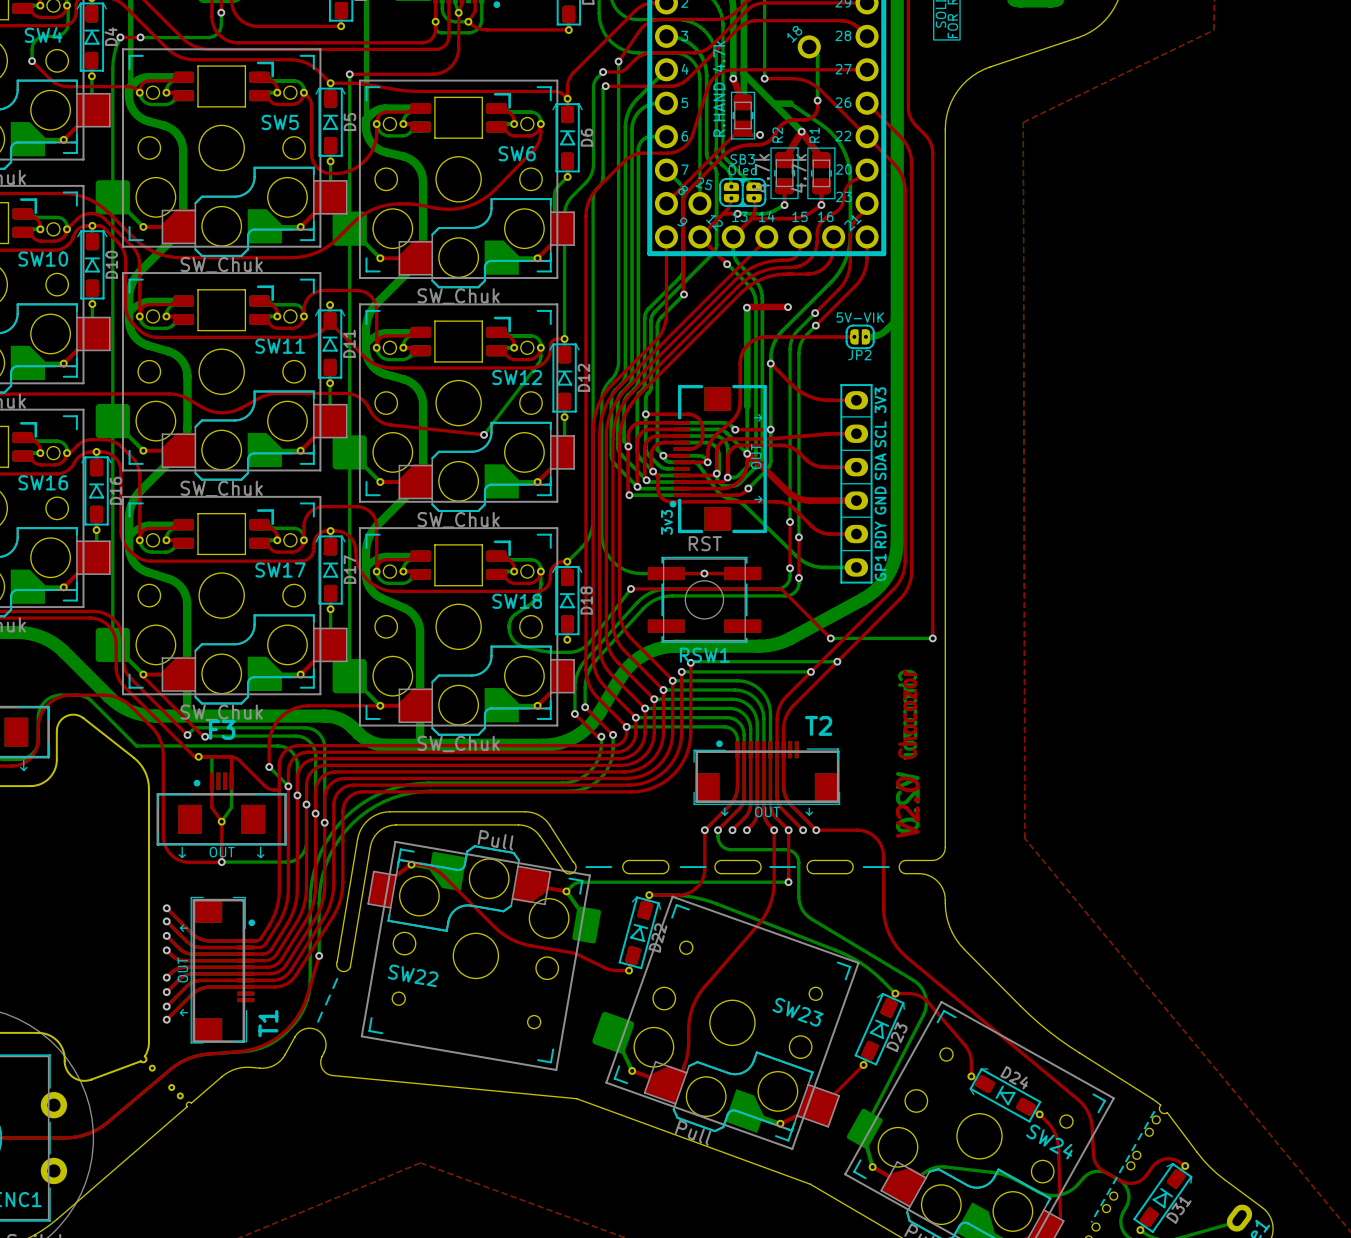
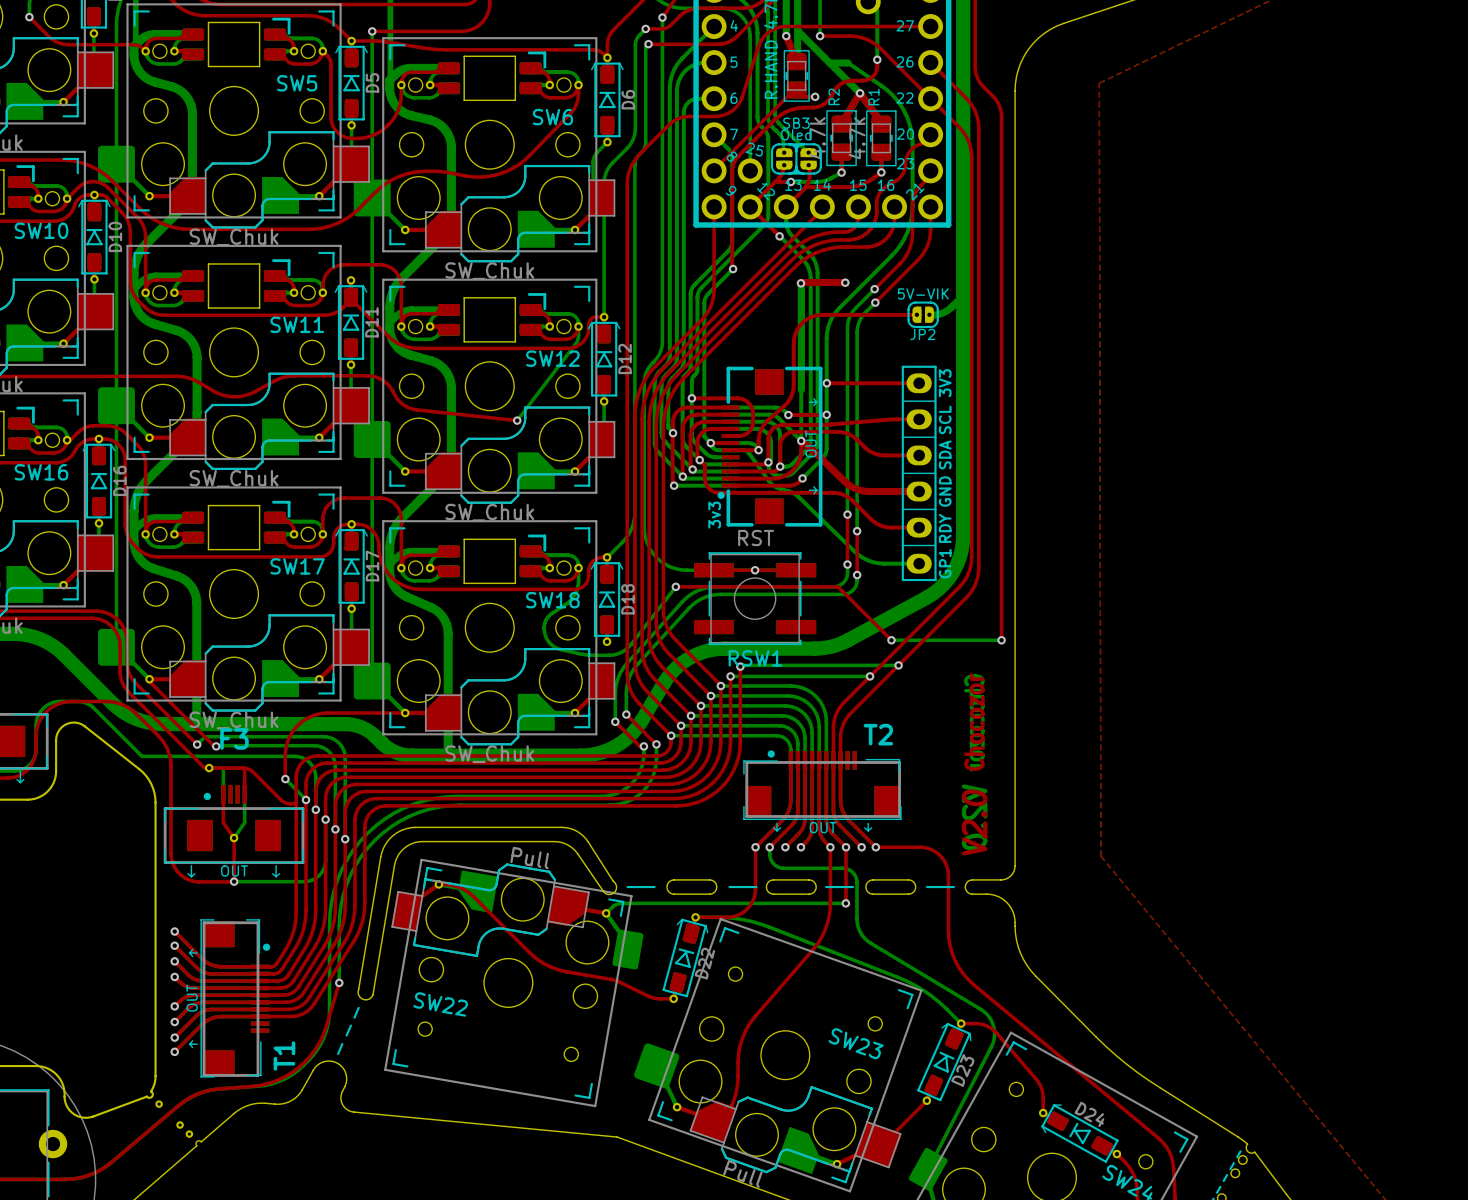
top track: (770, 363) (800, 391) (814, 398) (829, 400) -> (826, 383) (889, 383)
via position: (770, 363) -> (826, 383)

